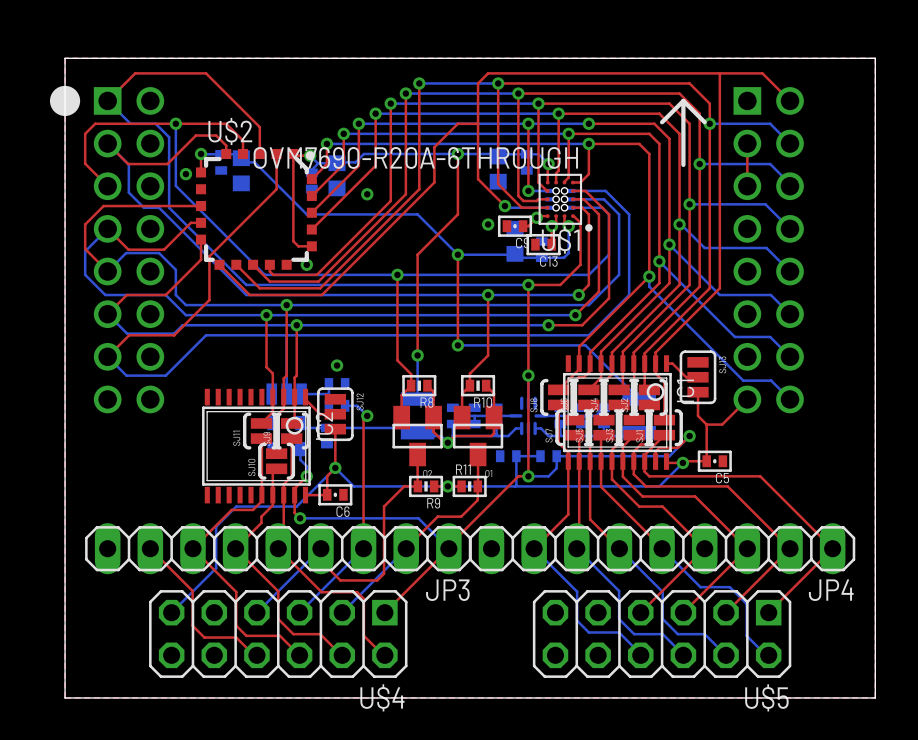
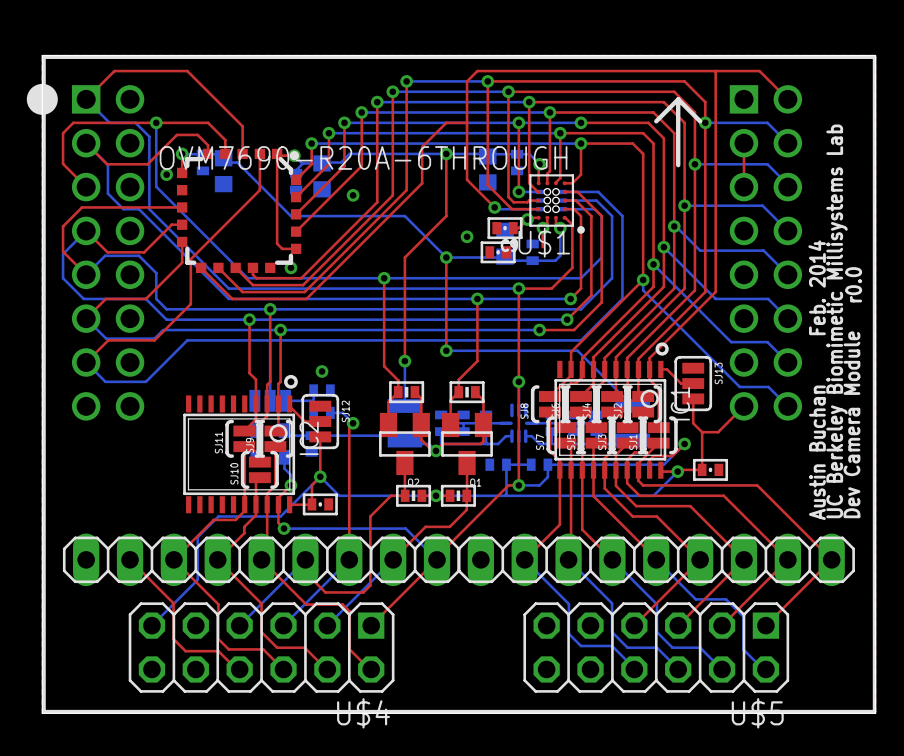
line: none -> (44, 57) (44, 711) (874, 711) (874, 57) (44, 57)
U$2 name: U$2 (230, 131) -> none
drawing: none -> [808, 124, 863, 521]
via position: (488, 224) -> (467, 236)
C13: (543, 244) -> none
part: none -> (498, 252)
drawing: none -> [655, 342, 669, 356]
drawing: none -> [284, 374, 298, 389]
R8 name: R8 (426, 402) -> none
R10 name: R10 (483, 402) -> none
R11 name: R11 (463, 469) -> none
C5 name: C5 (722, 478) -> none
R9 name: R9 (433, 503) -> none
C6 name: C6 (343, 511) -> none
JP3 name: JP3 (447, 590) -> none
JP4 name: JP4 (831, 590) -> none

